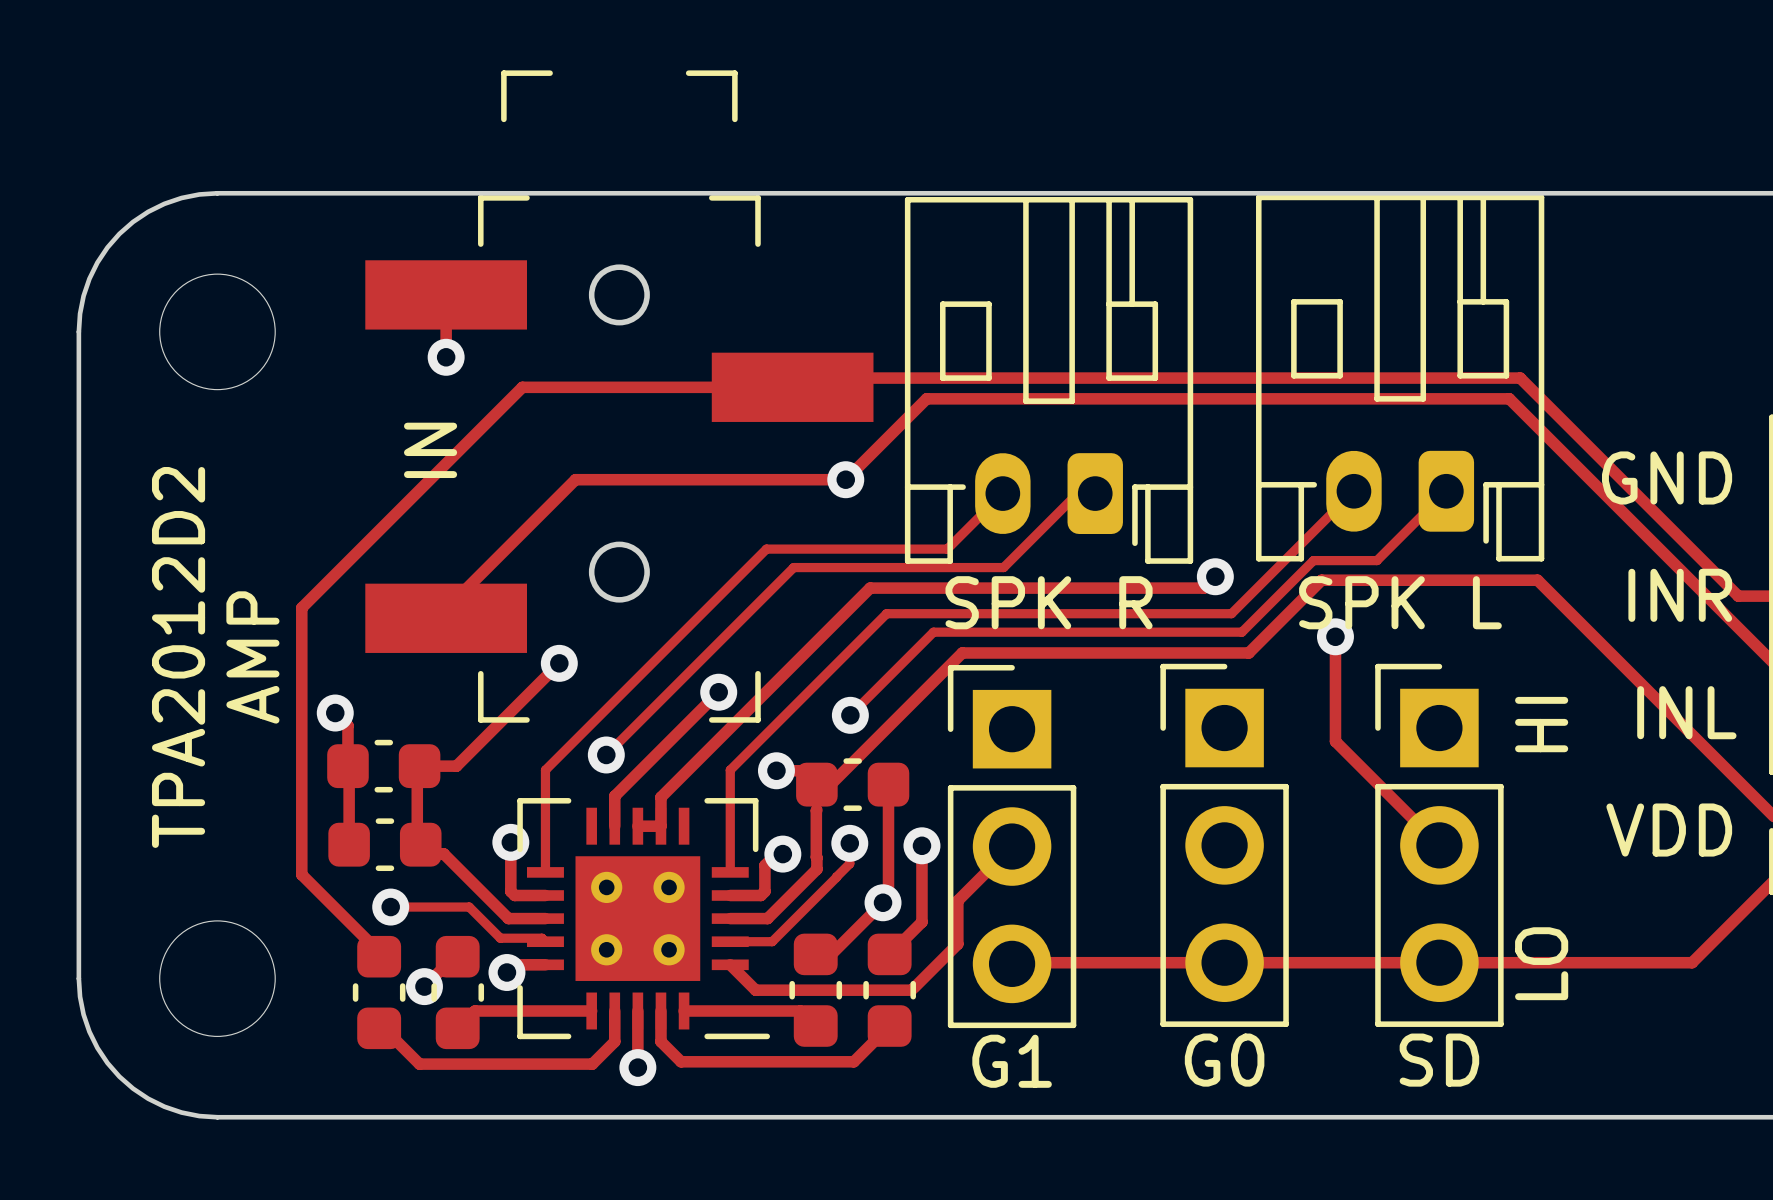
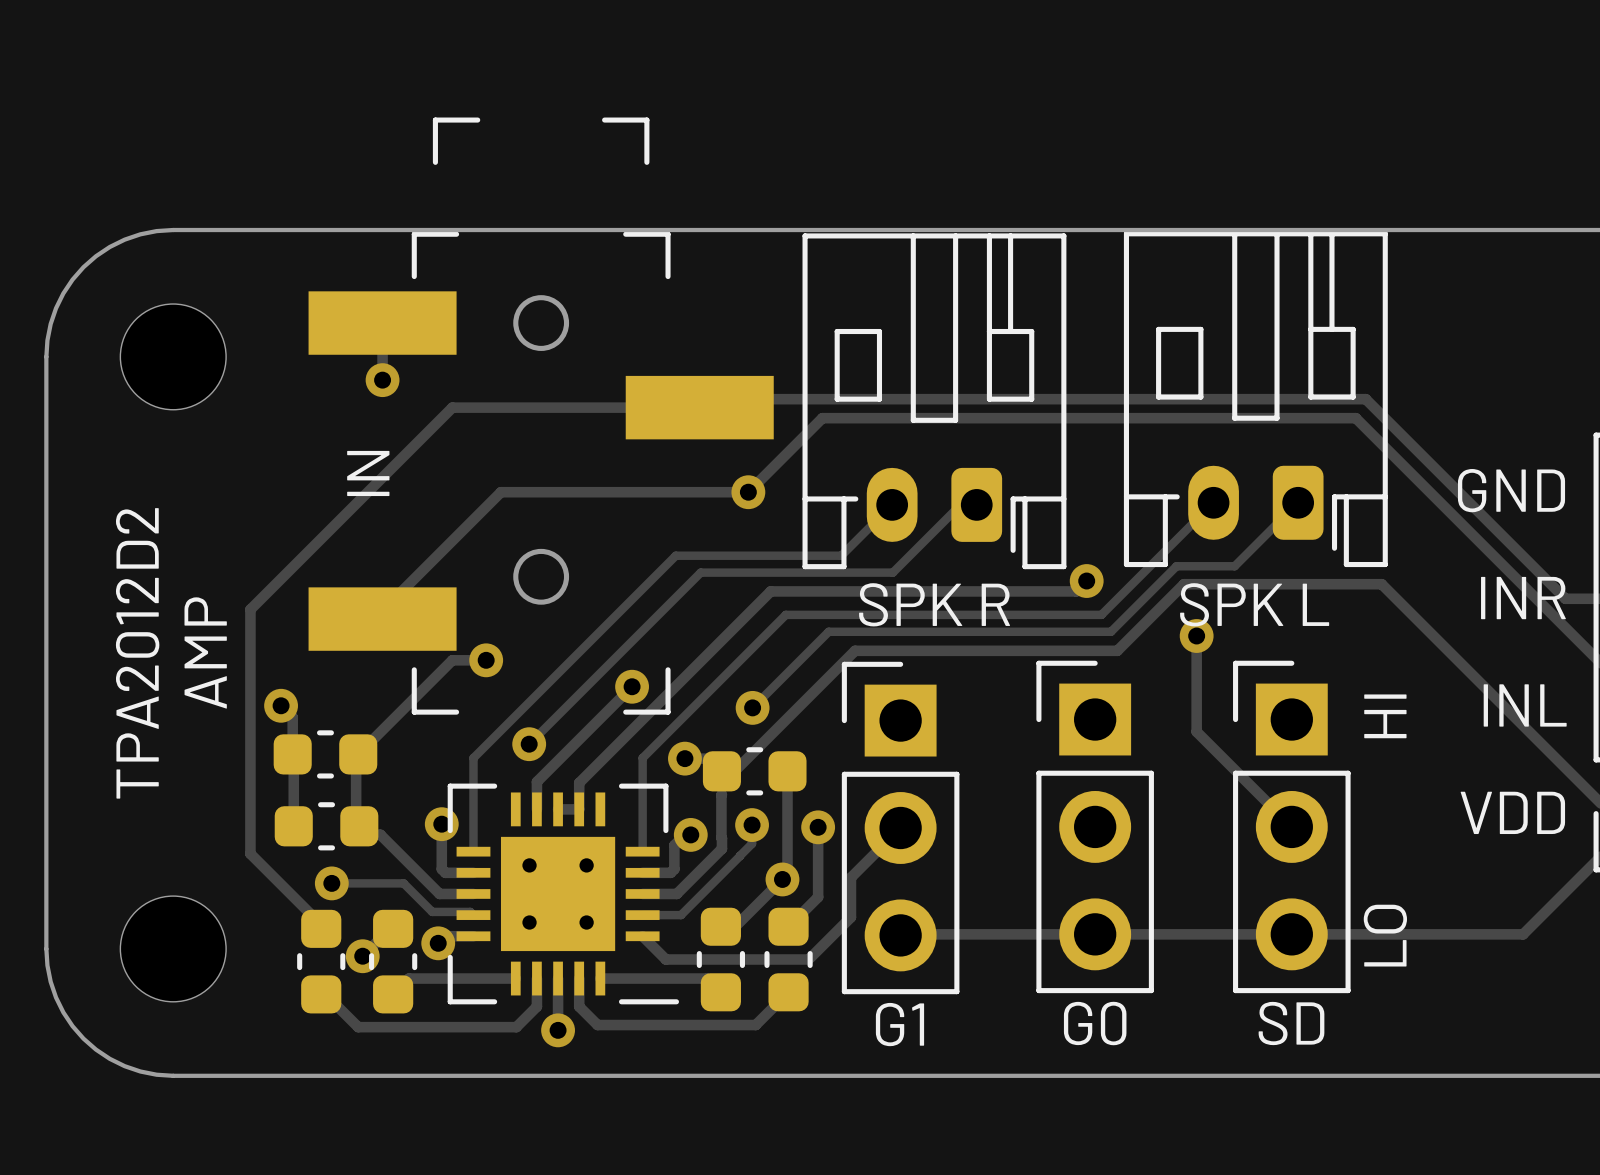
track: (559, 663) (456, 766) (419, 766) -> (486, 660) (452, 660) (358, 754)

